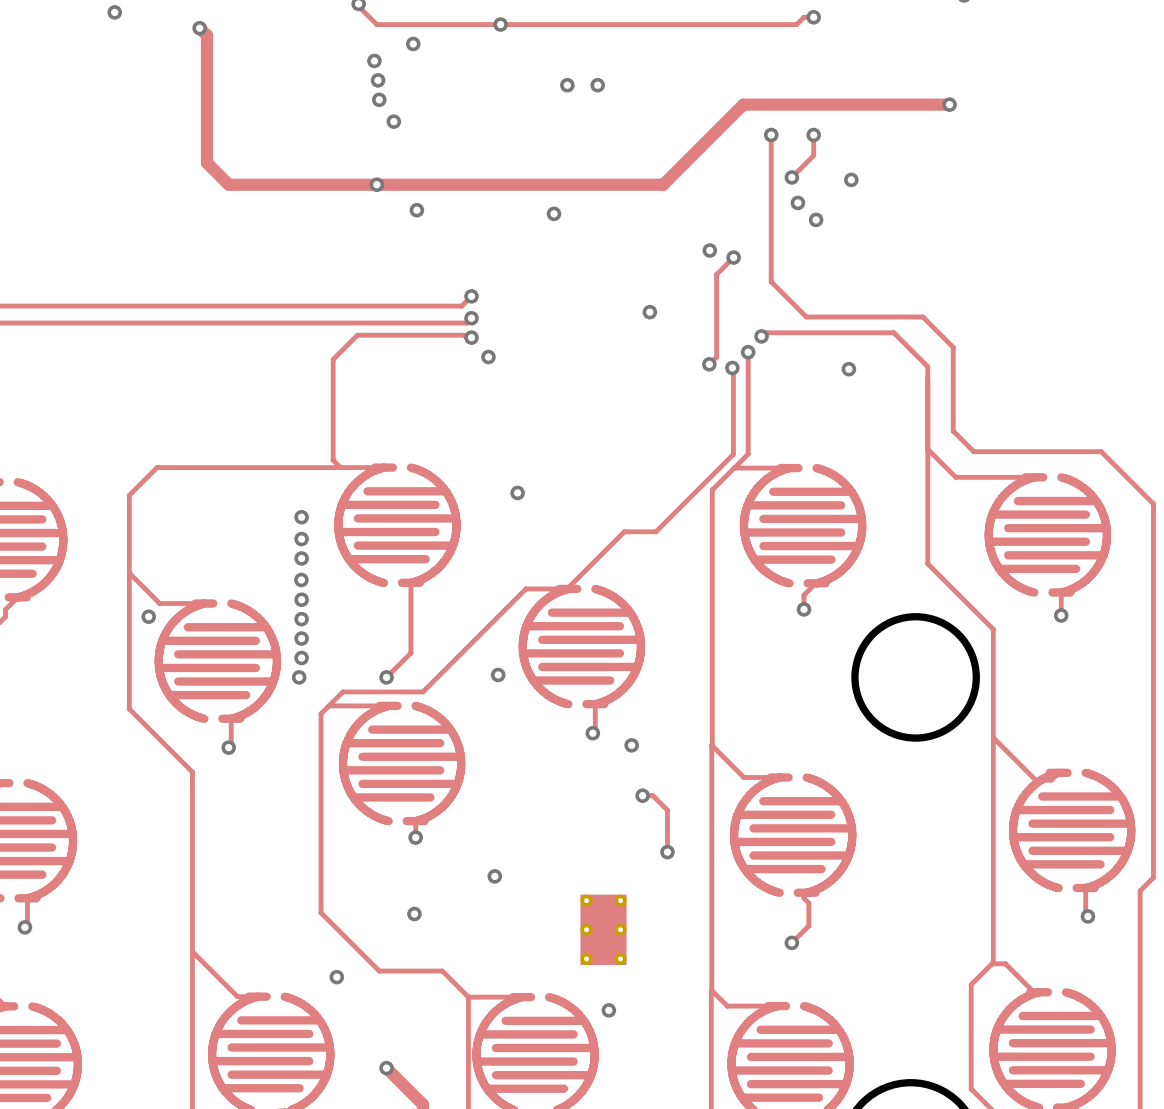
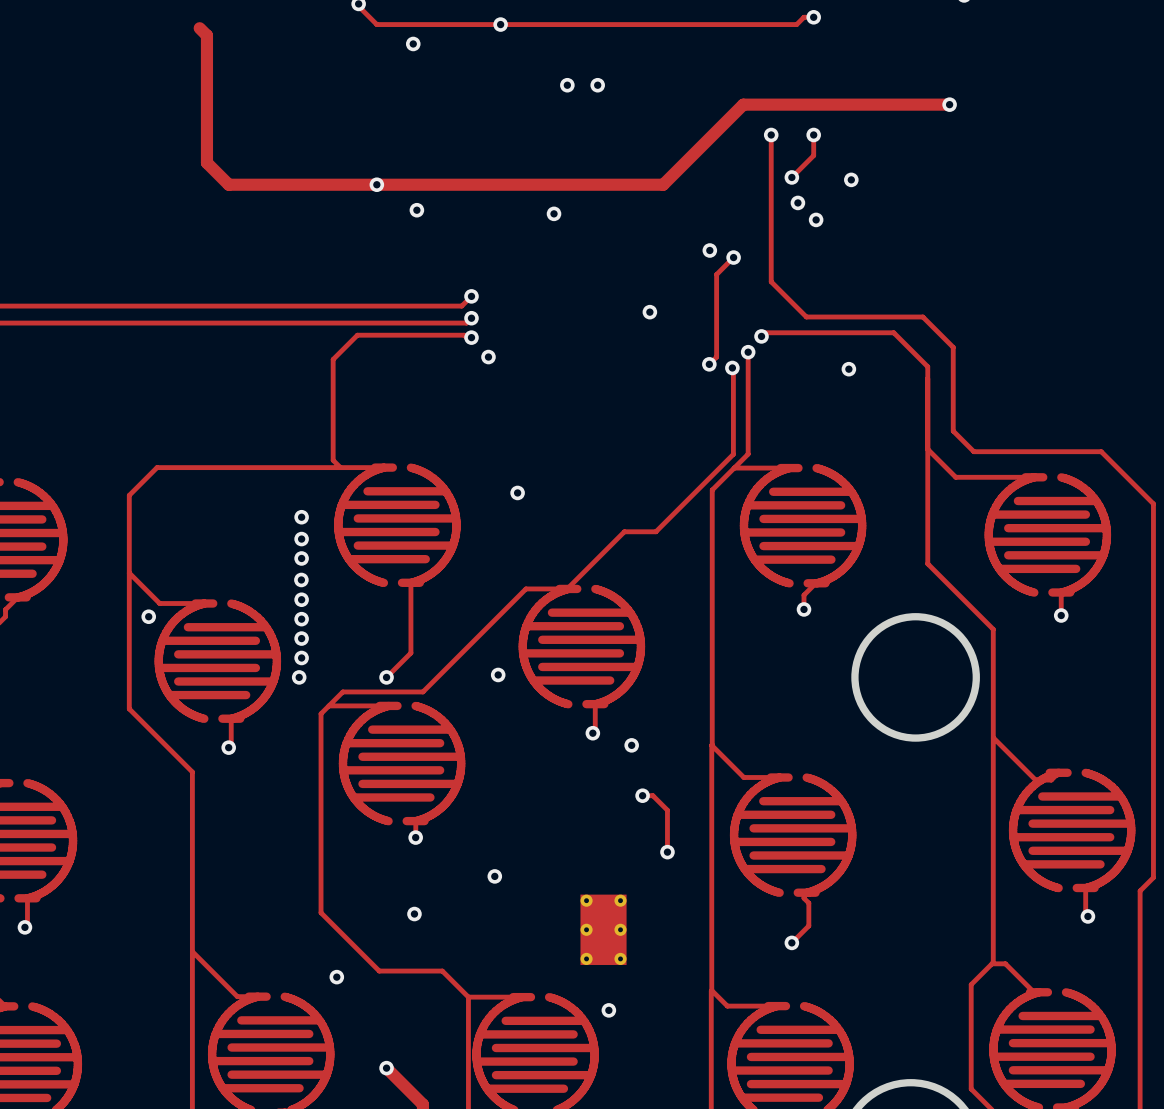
via: (114, 12) -> none
via: (199, 28) -> none
via: (374, 60) -> none
via: (378, 80) -> none
via: (379, 99) -> none
via: (393, 121) -> none

